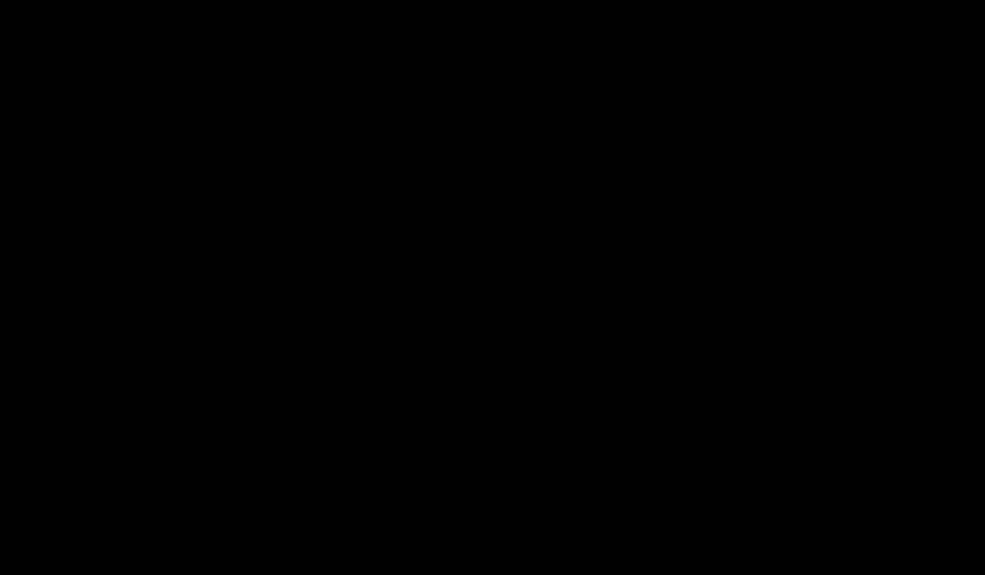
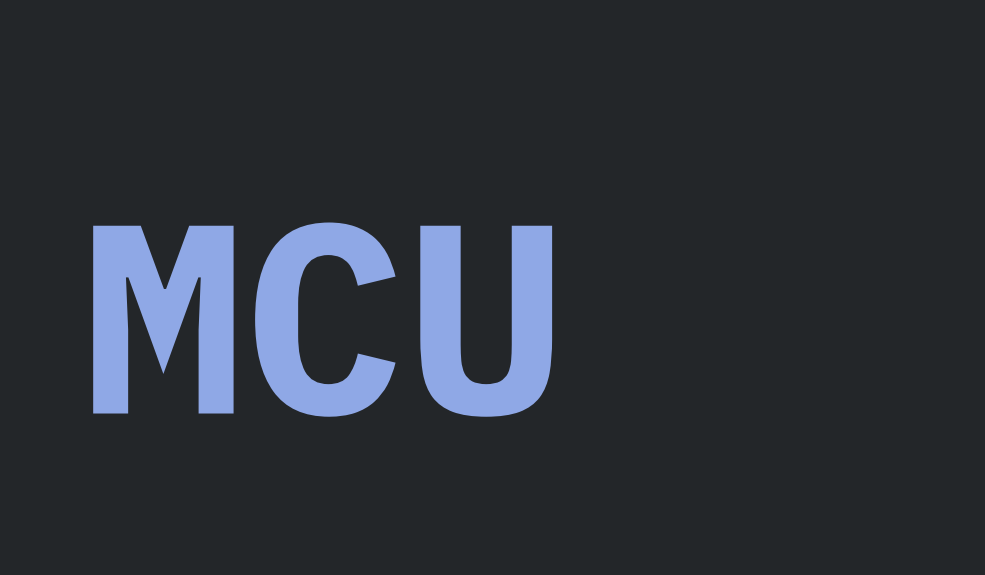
text: none -> MCU (322, 319)

